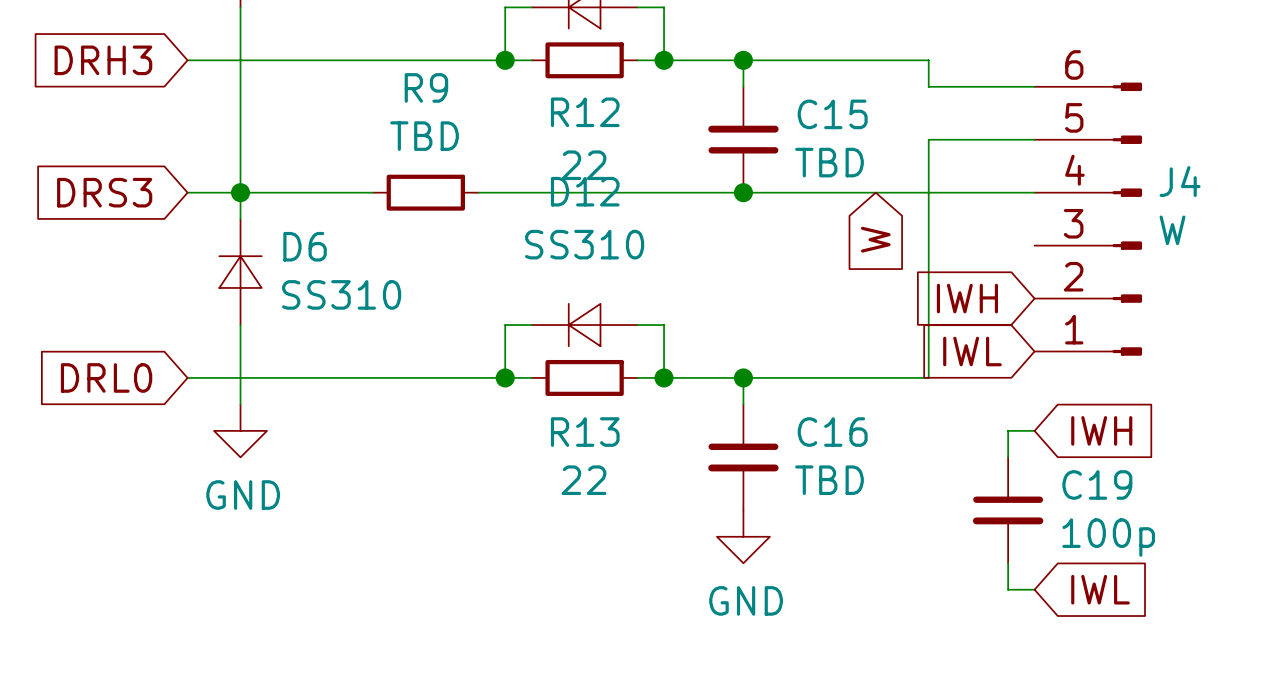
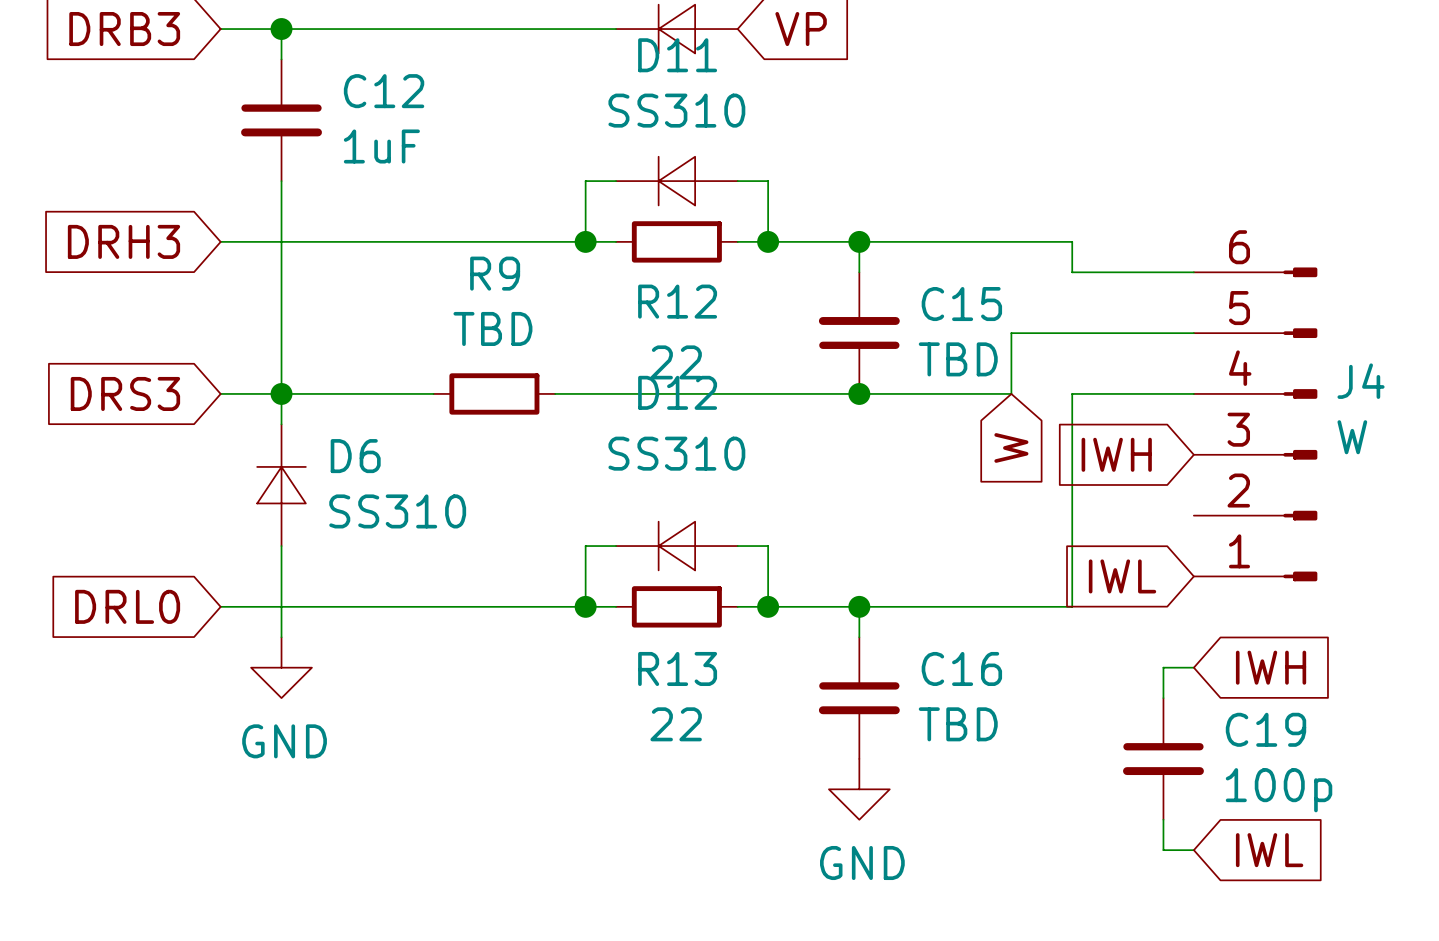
wire: (928, 139) (928, 192) (875, 192) -> (1072, 333) (1011, 333) (1011, 393)
global label position: IWH (967, 298) -> IWH (1116, 454)

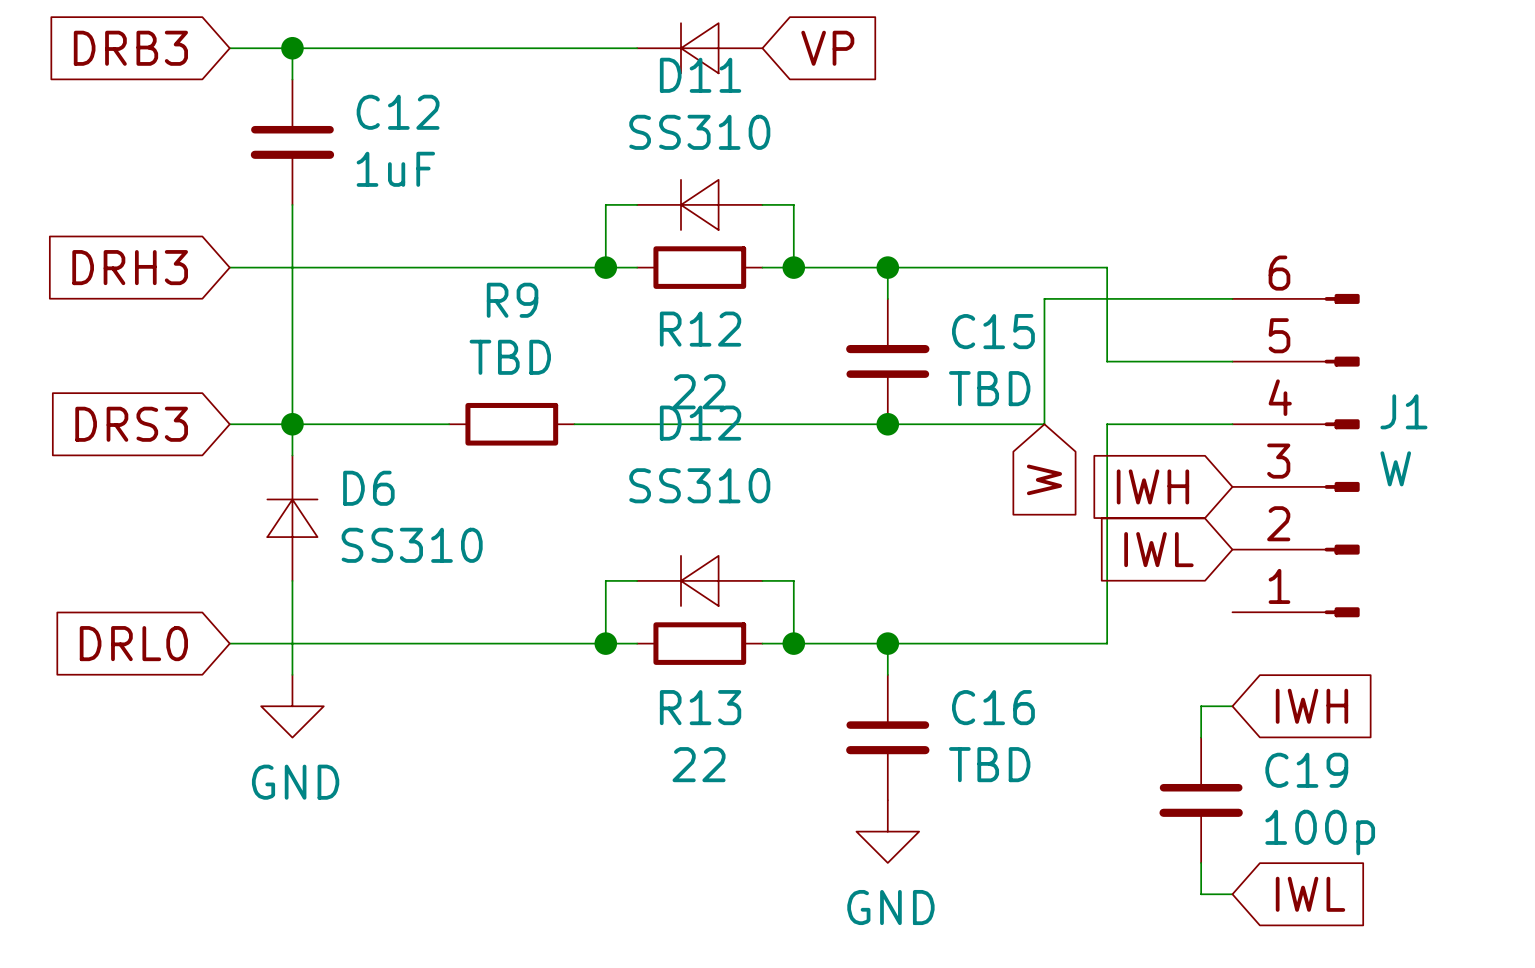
wire: (1011, 333) (1072, 333) -> (1044, 361) (1044, 298) (1107, 298) (1107, 361)
J4 name: J4 (1361, 381) -> J1 (1403, 411)
global label position: IWL (1122, 576) -> IWL (1158, 549)

